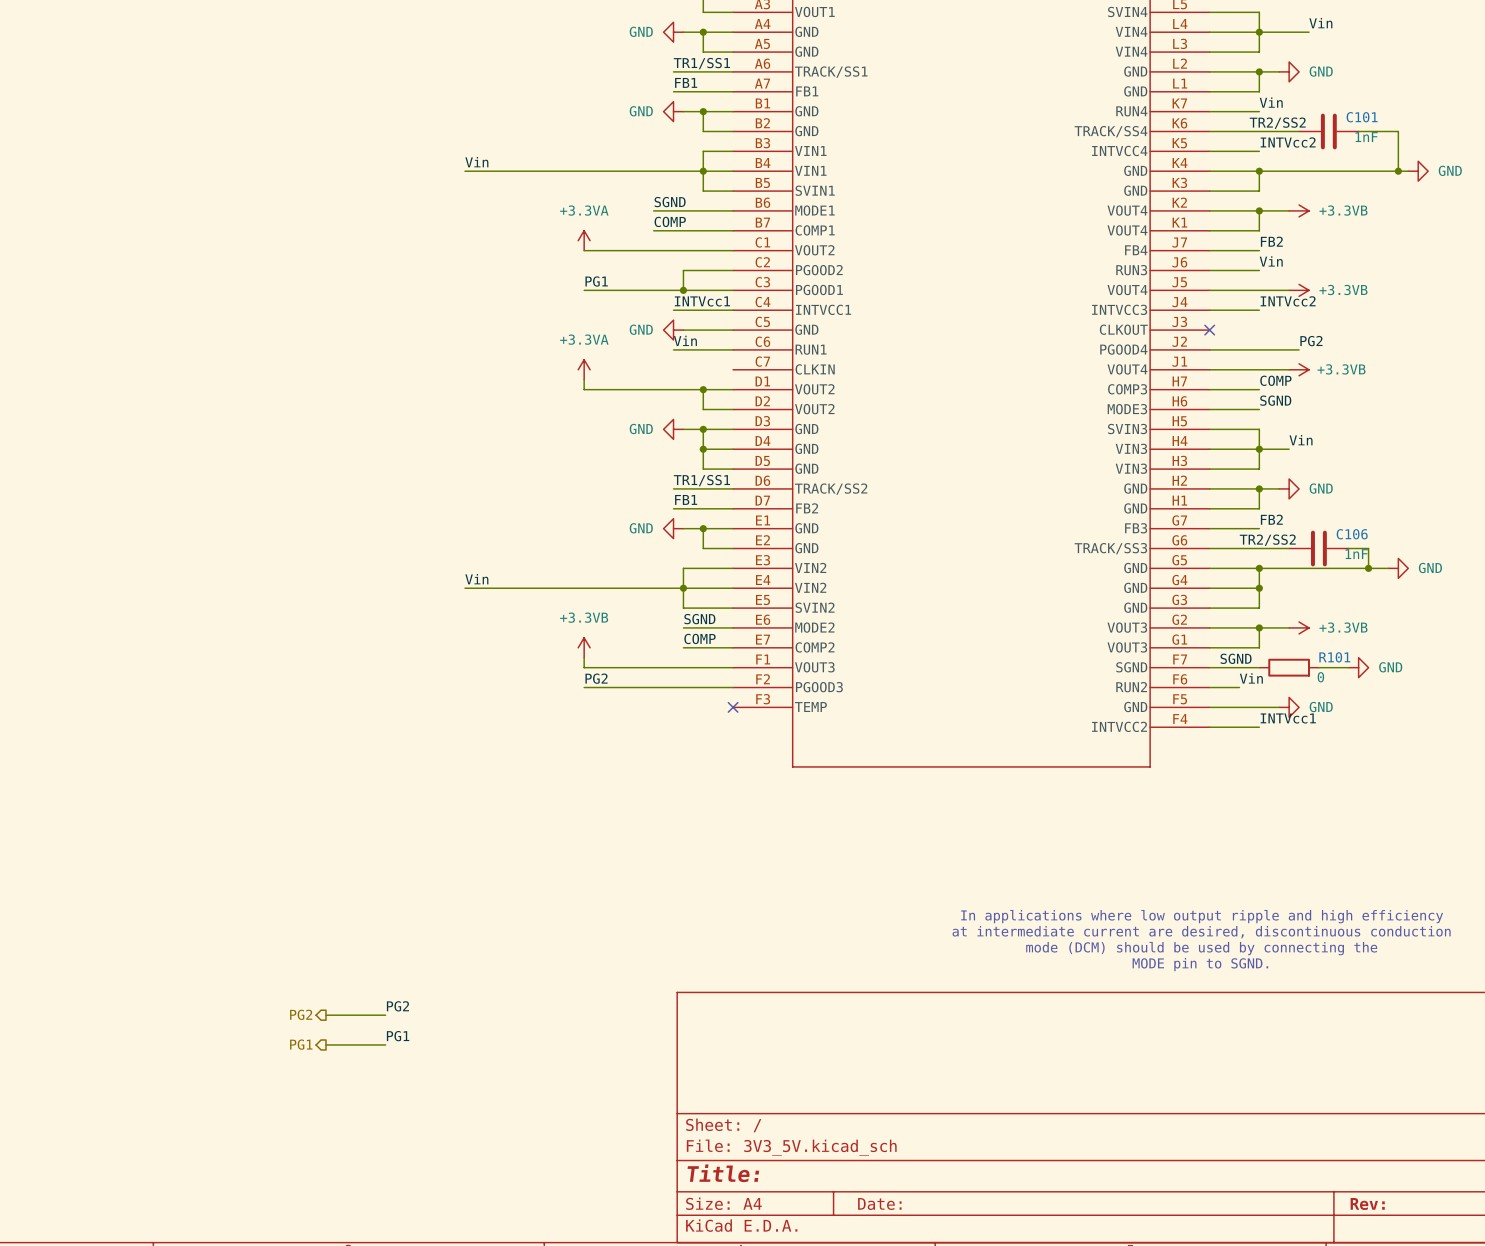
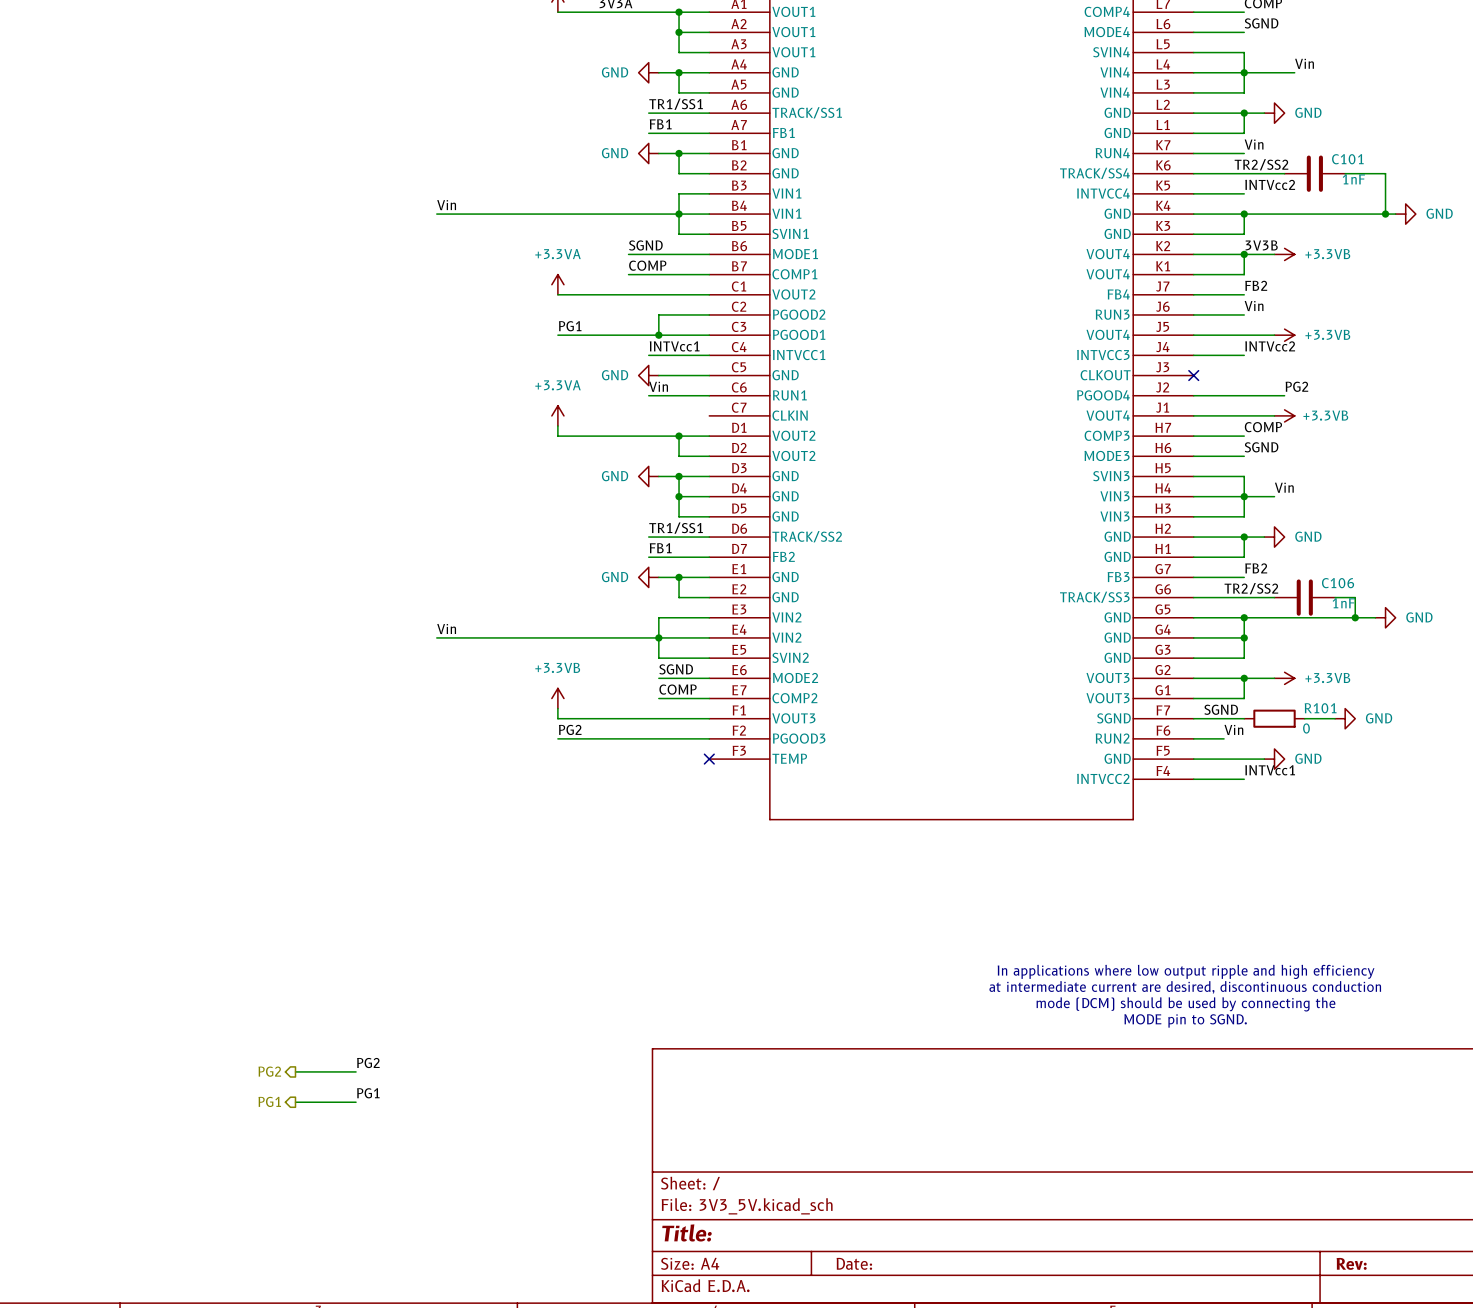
label: none -> 3V3B (1261, 245)

